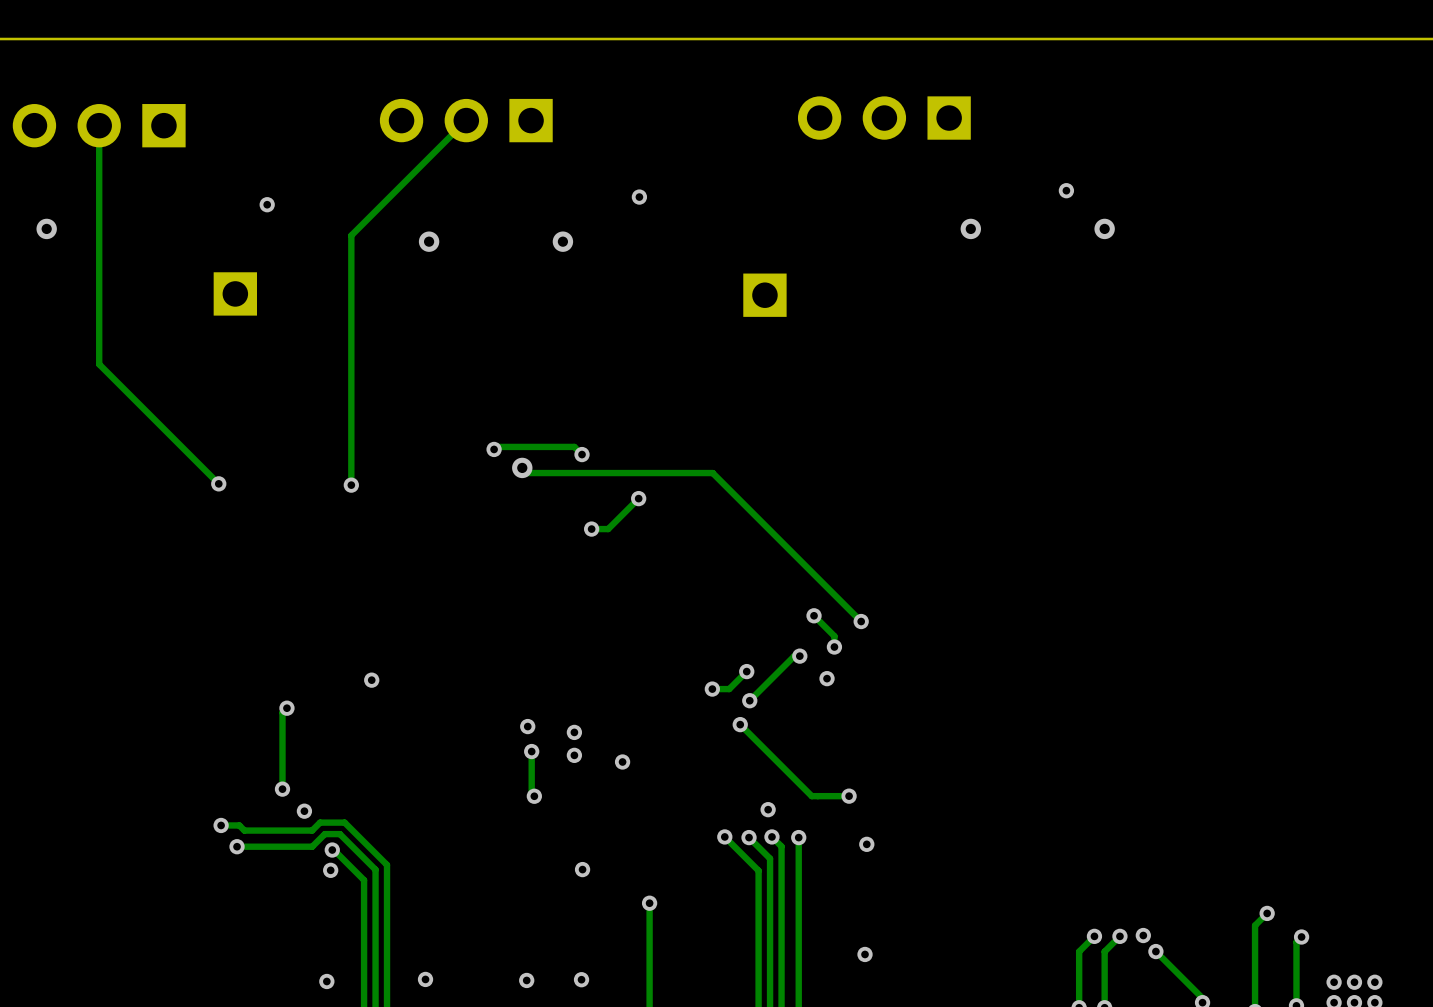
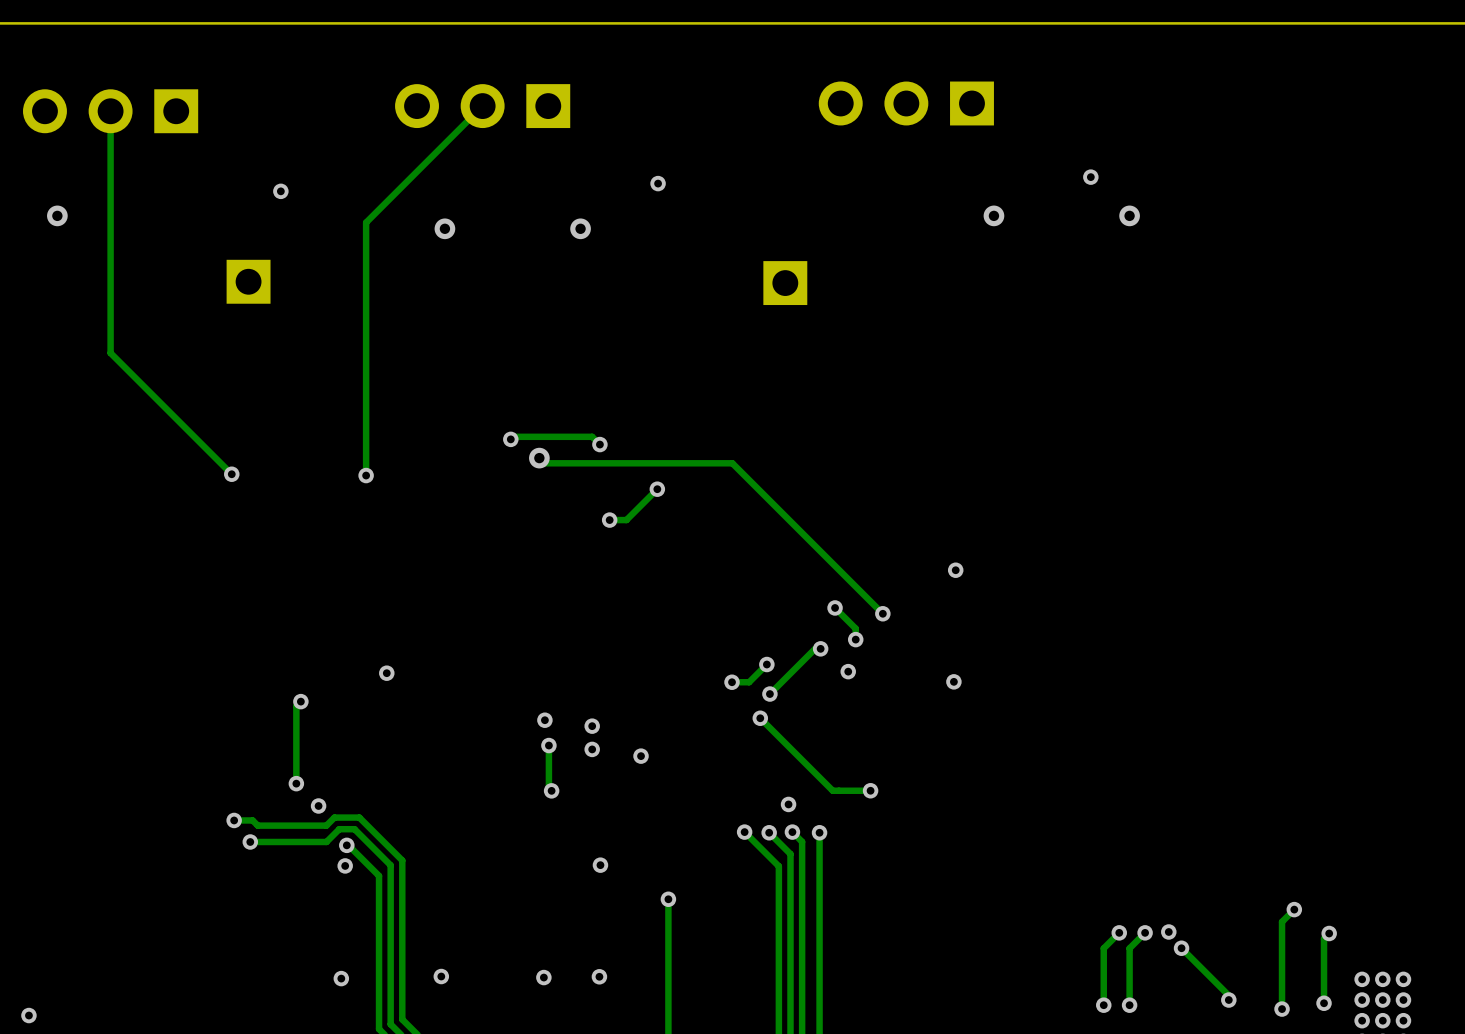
via: none -> (955, 570)
via: none -> (953, 681)
via: (866, 844) -> none
via: (865, 954) -> none

